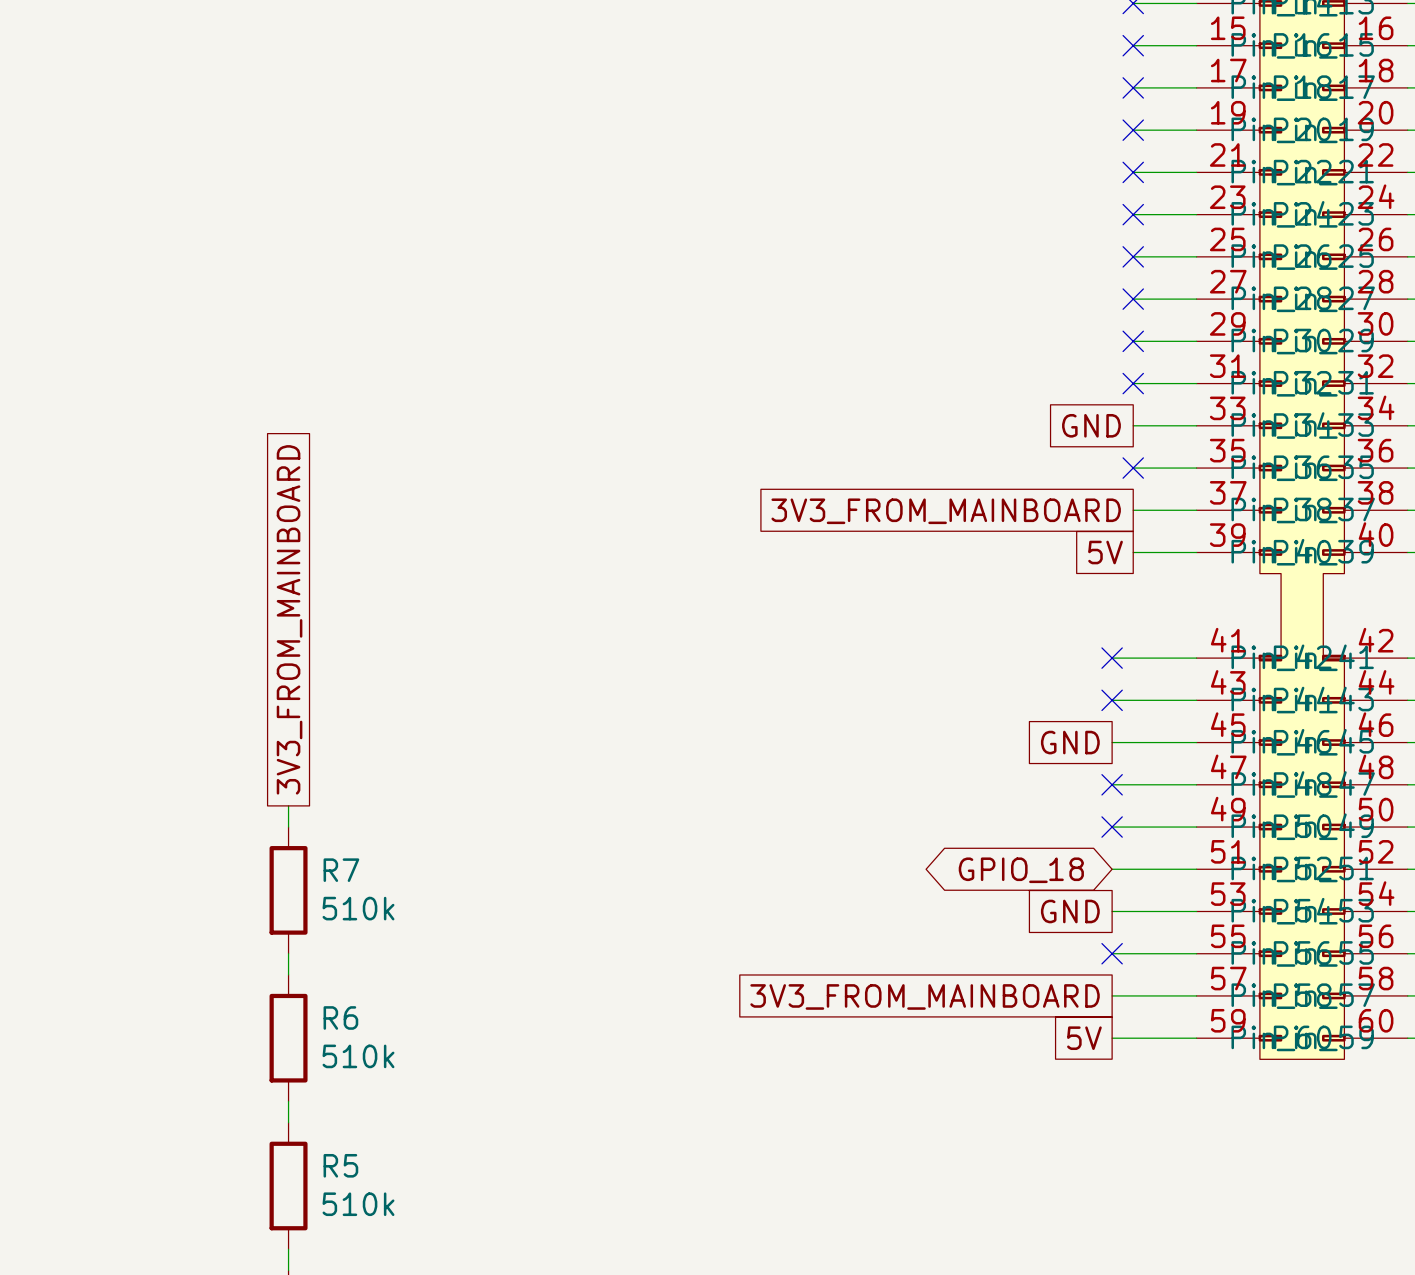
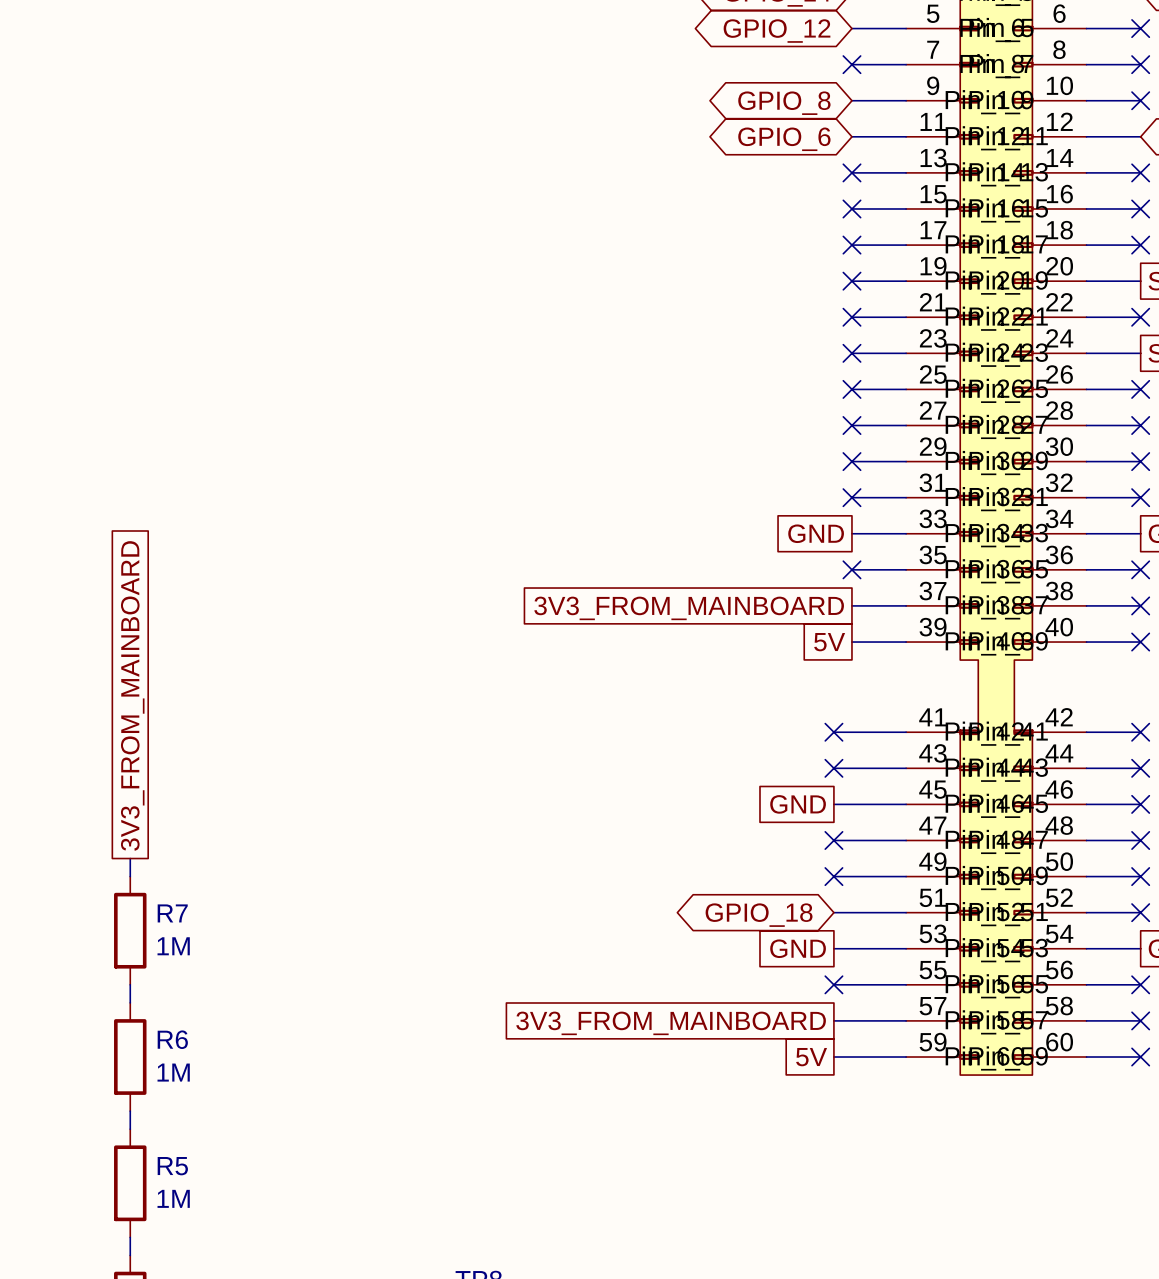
R7 value: 510k (358, 908) -> 1M (173, 946)
R6 value: 510k (358, 1056) -> 1M (173, 1072)
R5 value: 510k (358, 1204) -> 1M (173, 1198)

